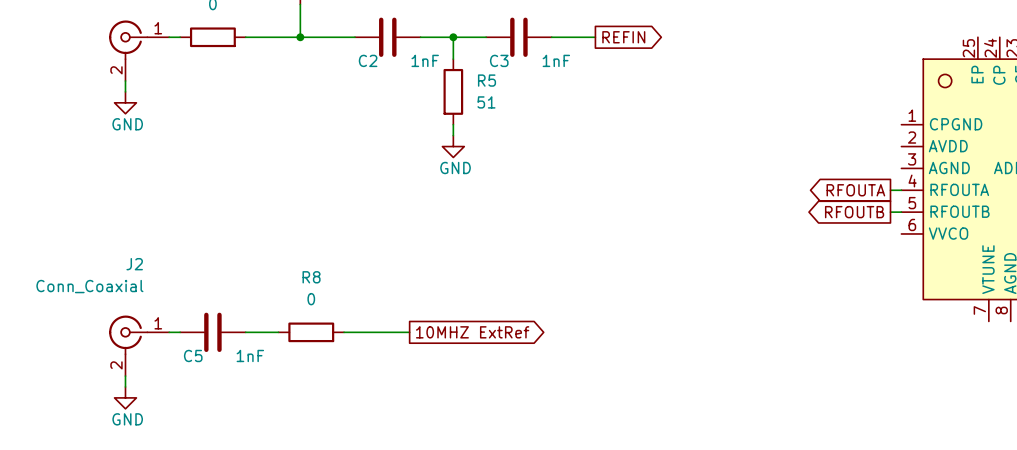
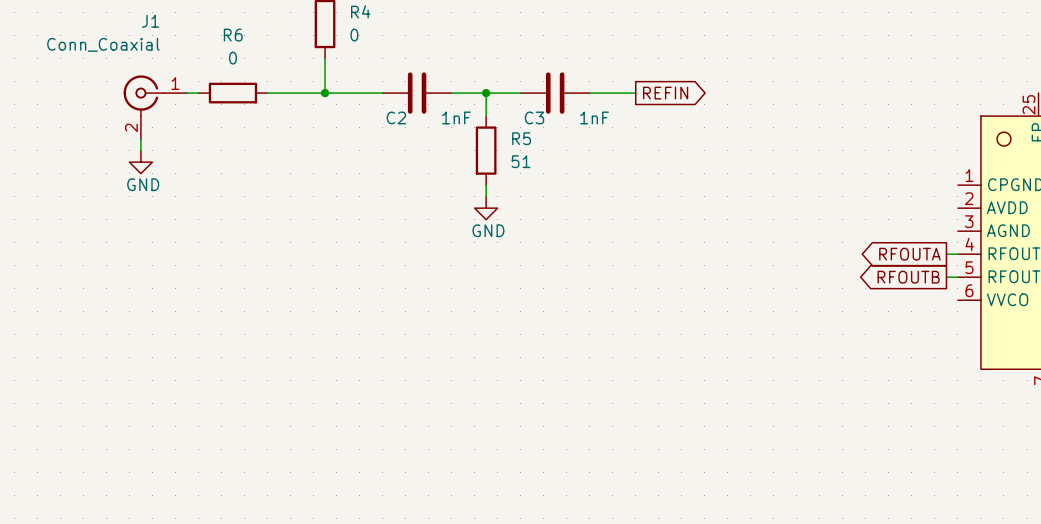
wire: (169, 332) (180, 332) -> none
C5: 1nF (212, 332) -> none
wire: (245, 332) (278, 332) -> none
R8: 0 (311, 332) -> none
wire: (344, 332) (409, 332) -> none
global label: 10MHZ ExtRef (472, 332) -> none
J2: Conn_Coaxial (139, 345) -> none
wire: (125, 376) (125, 386) -> none
power symbol: GND (125, 397) -> none

